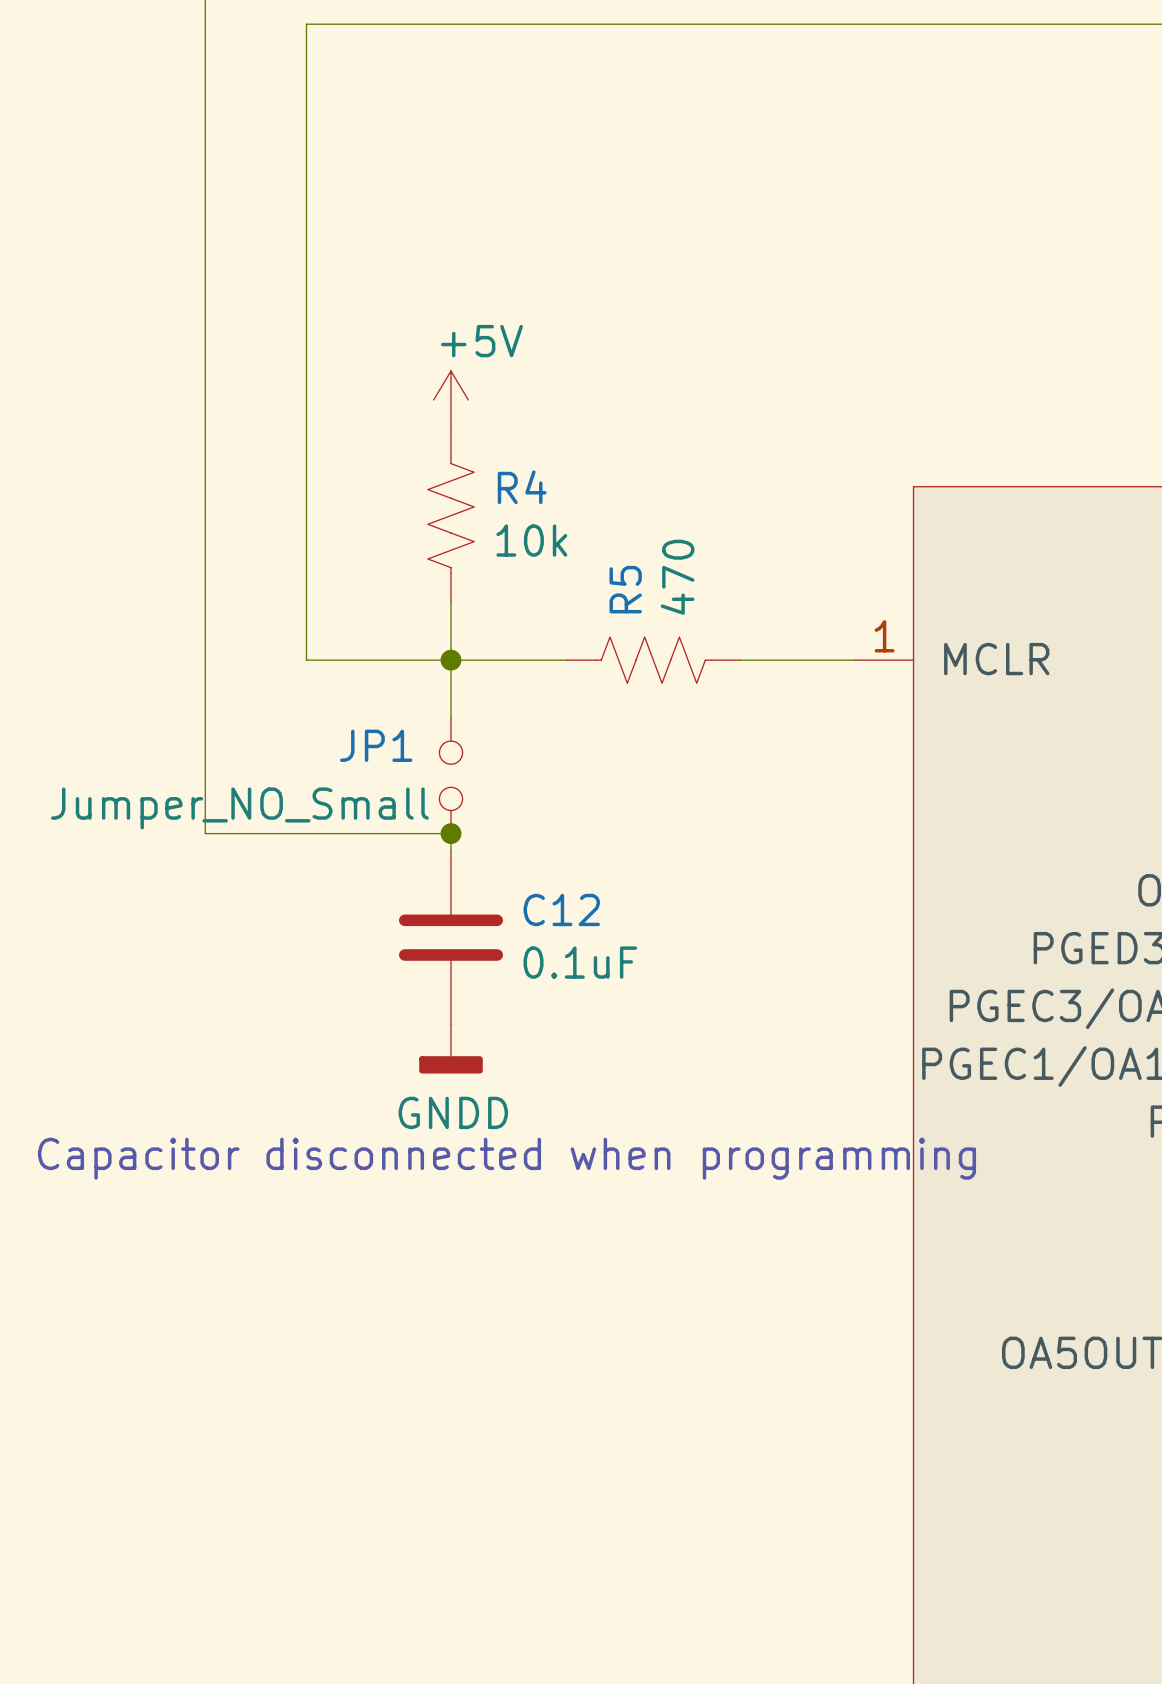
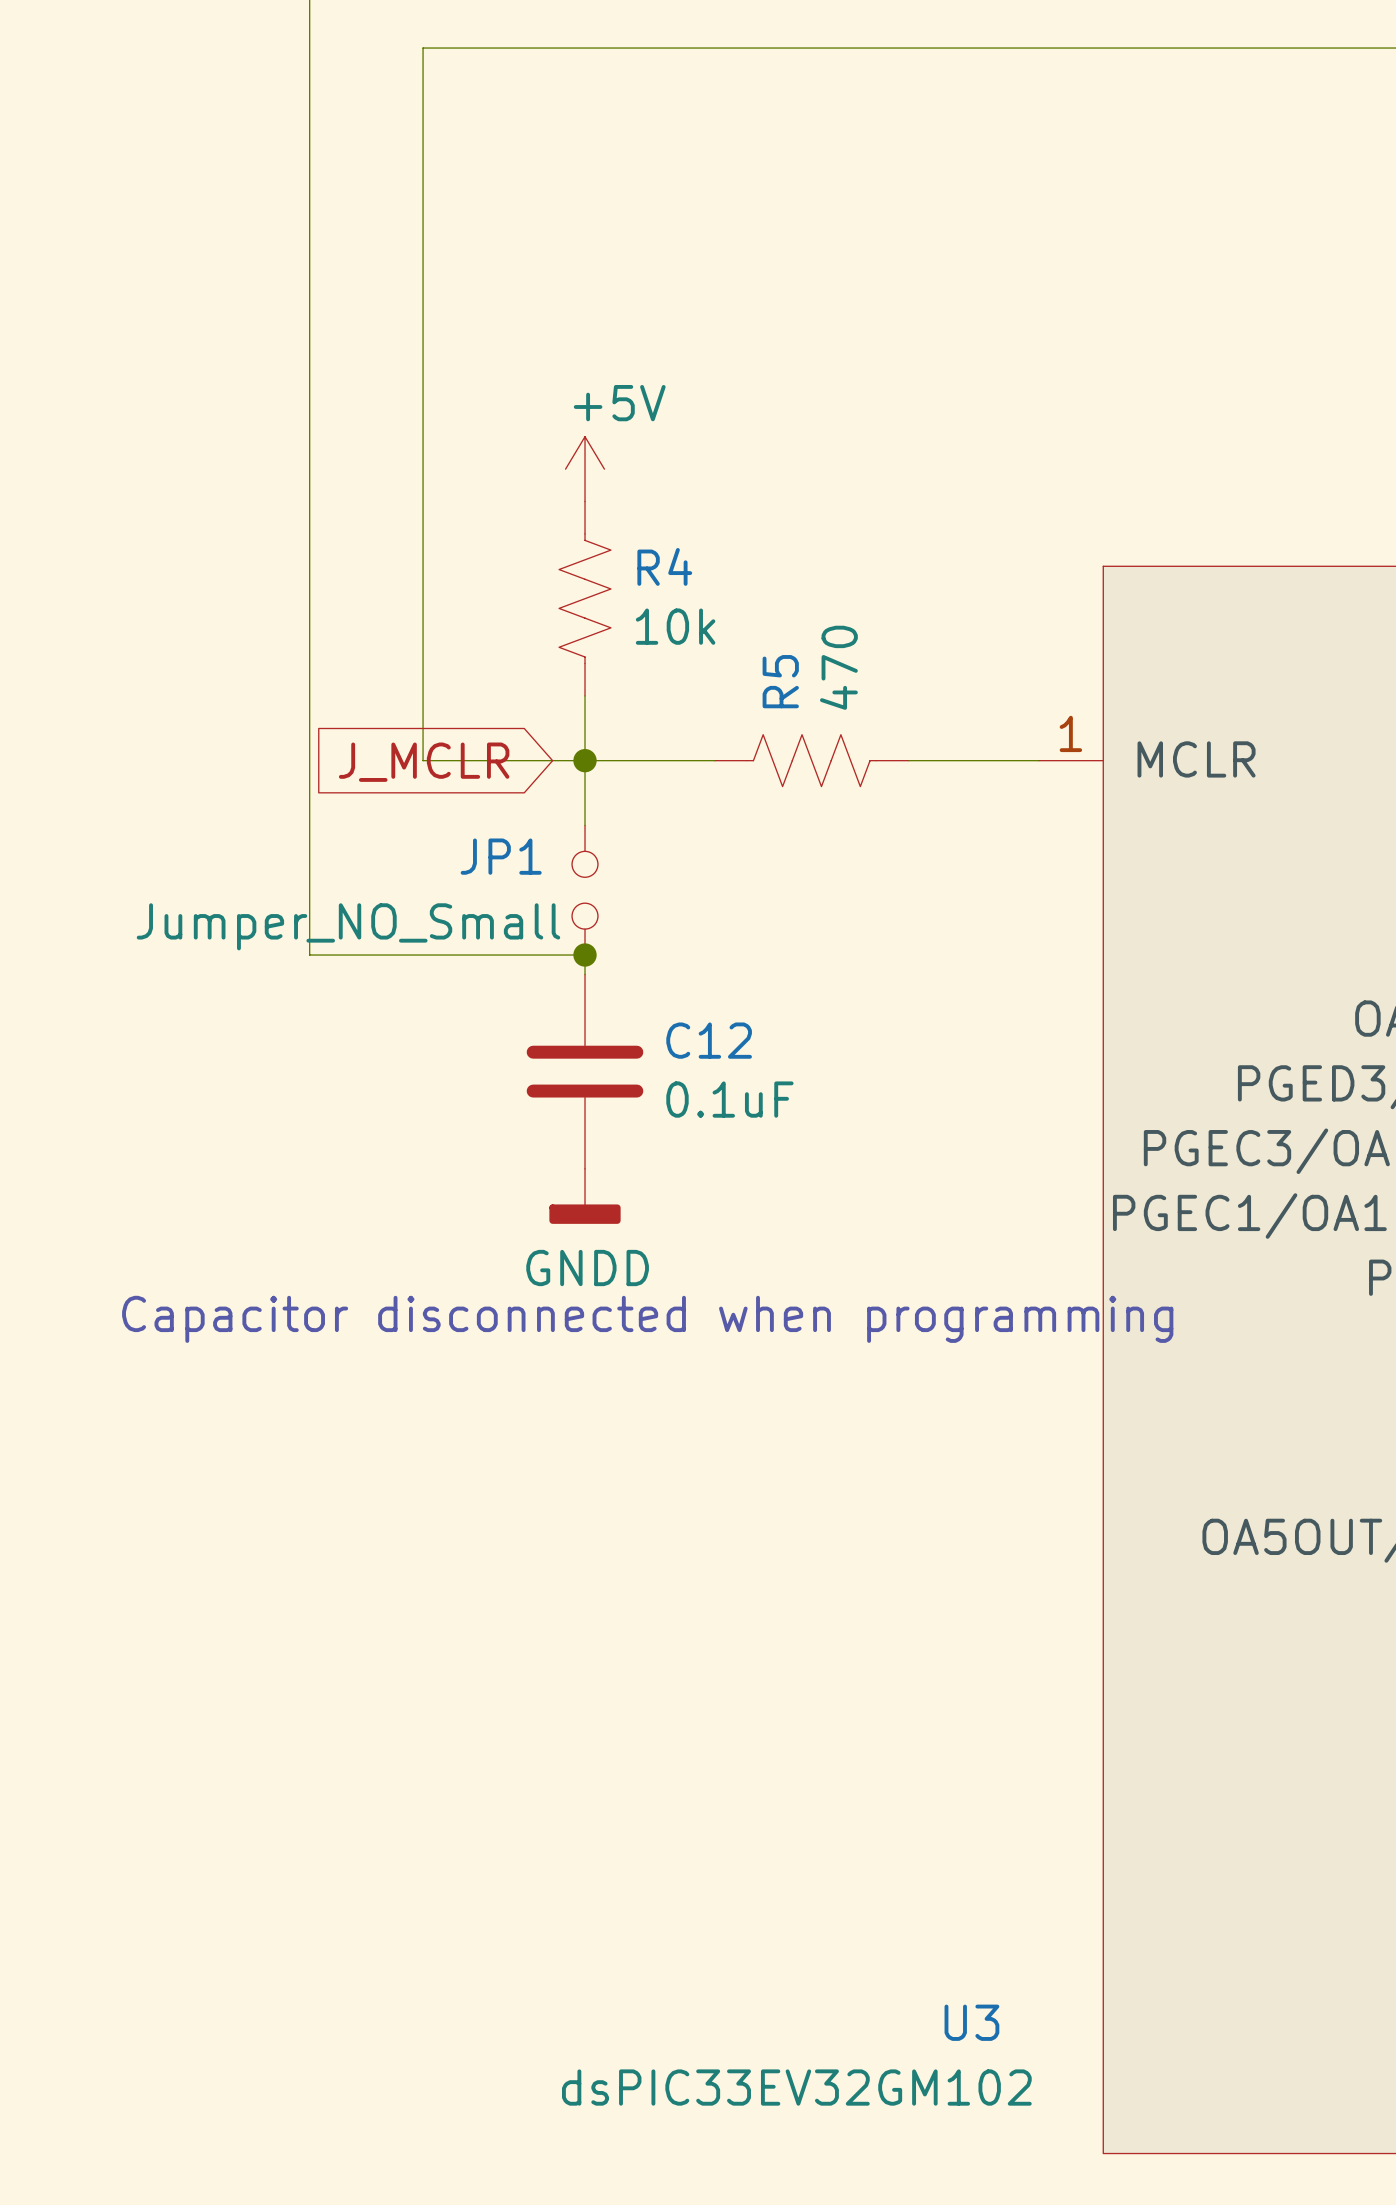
global label: none -> J_MCLR (424, 762)

